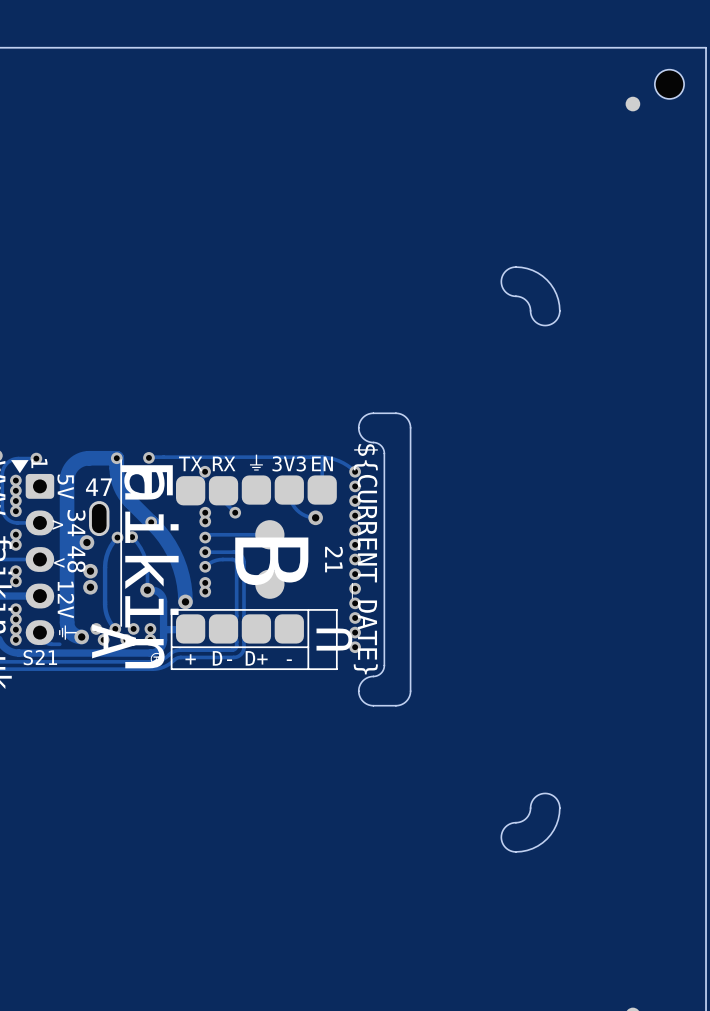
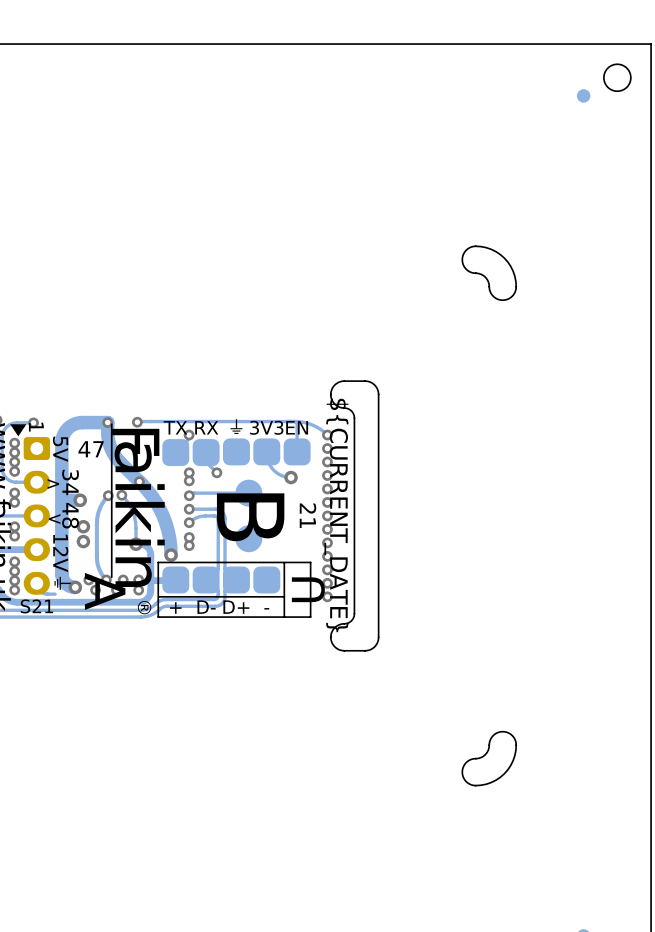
part: (99, 518) -> none

